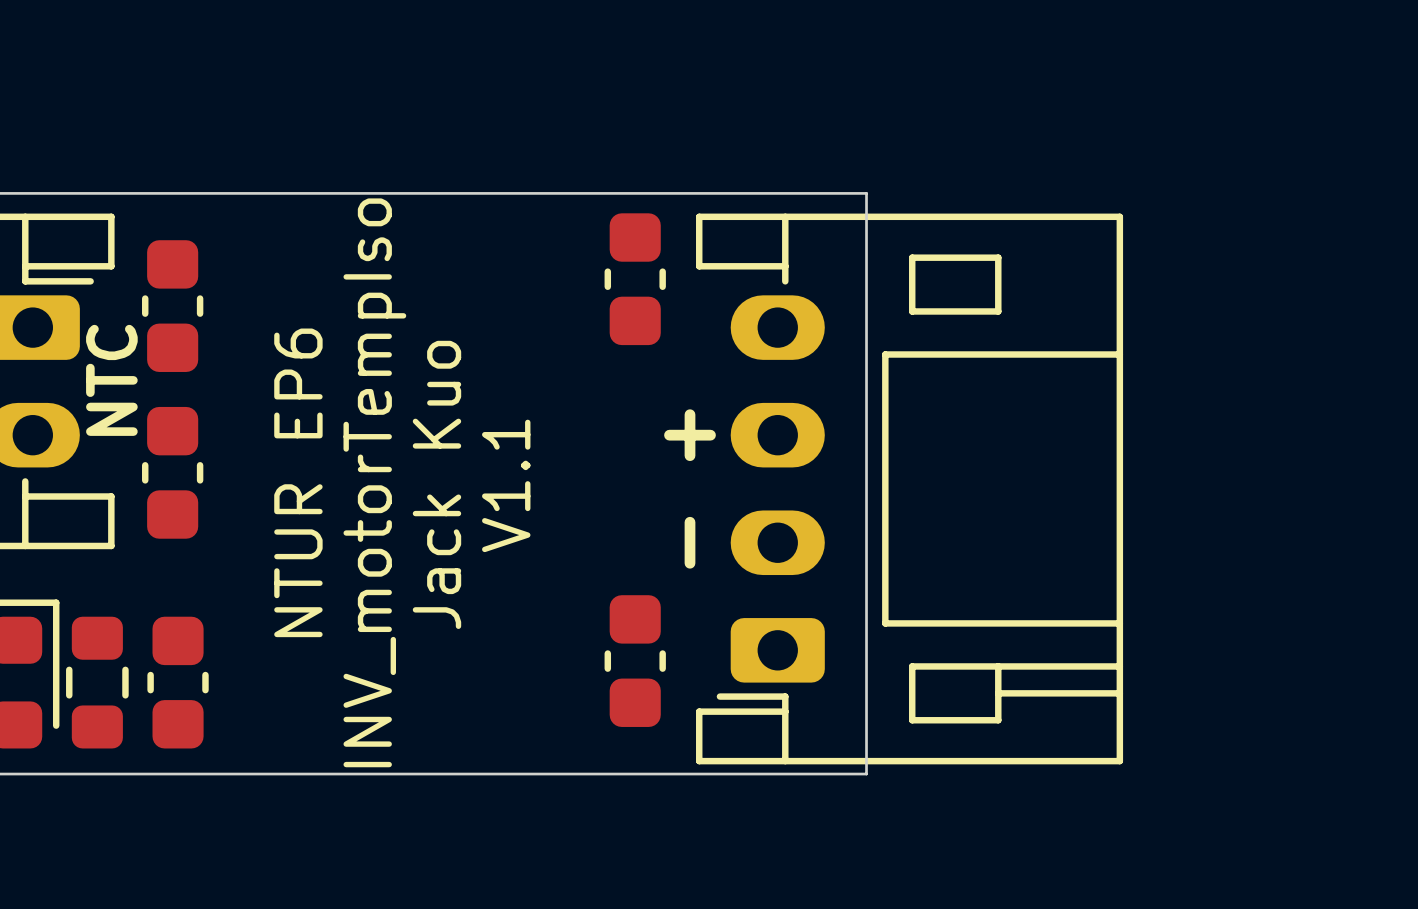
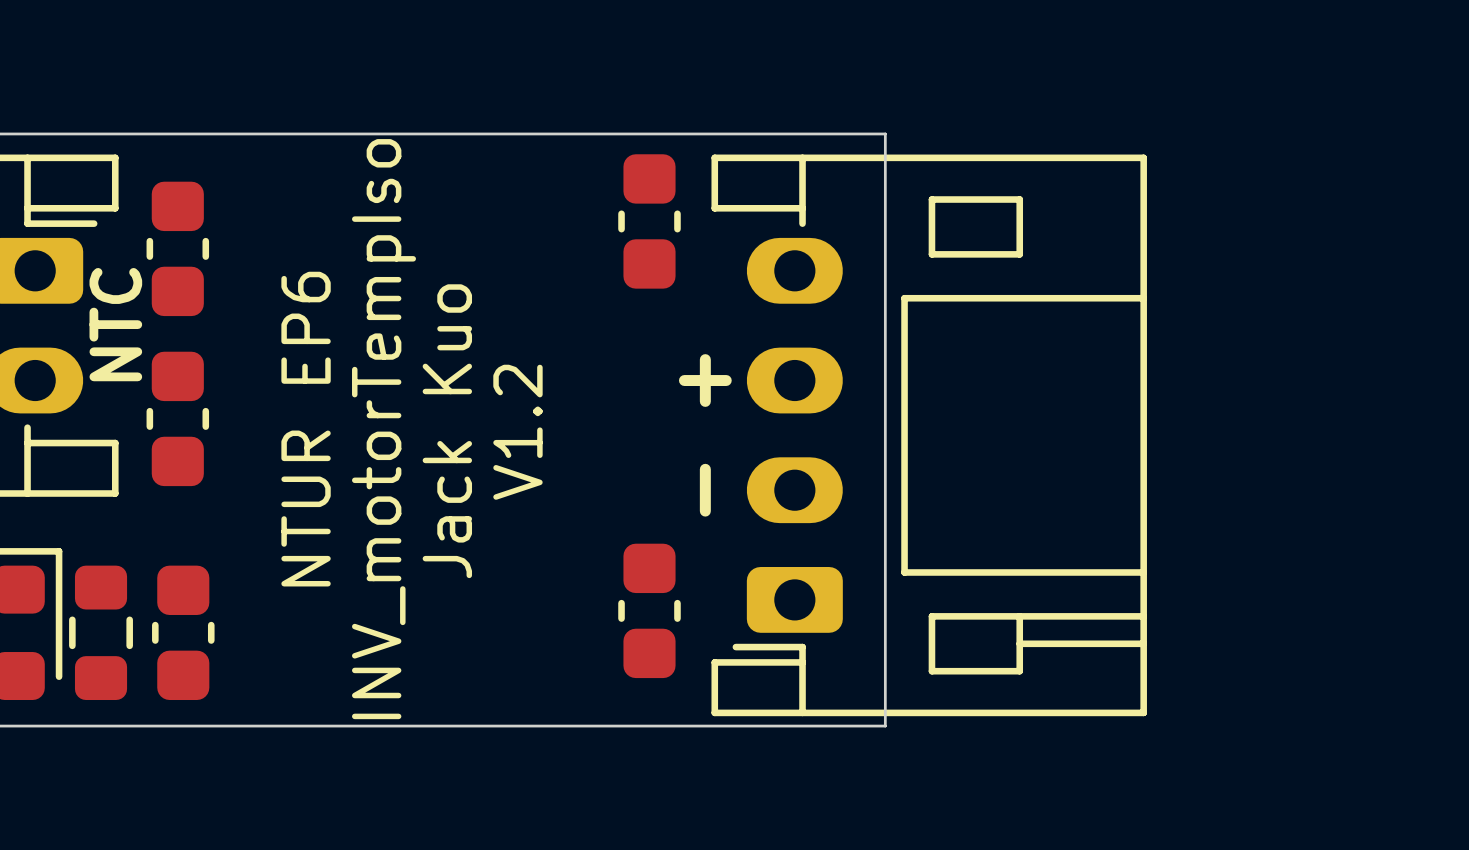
text: V1.1 (506, 485) -> V1.2 (517, 432)

